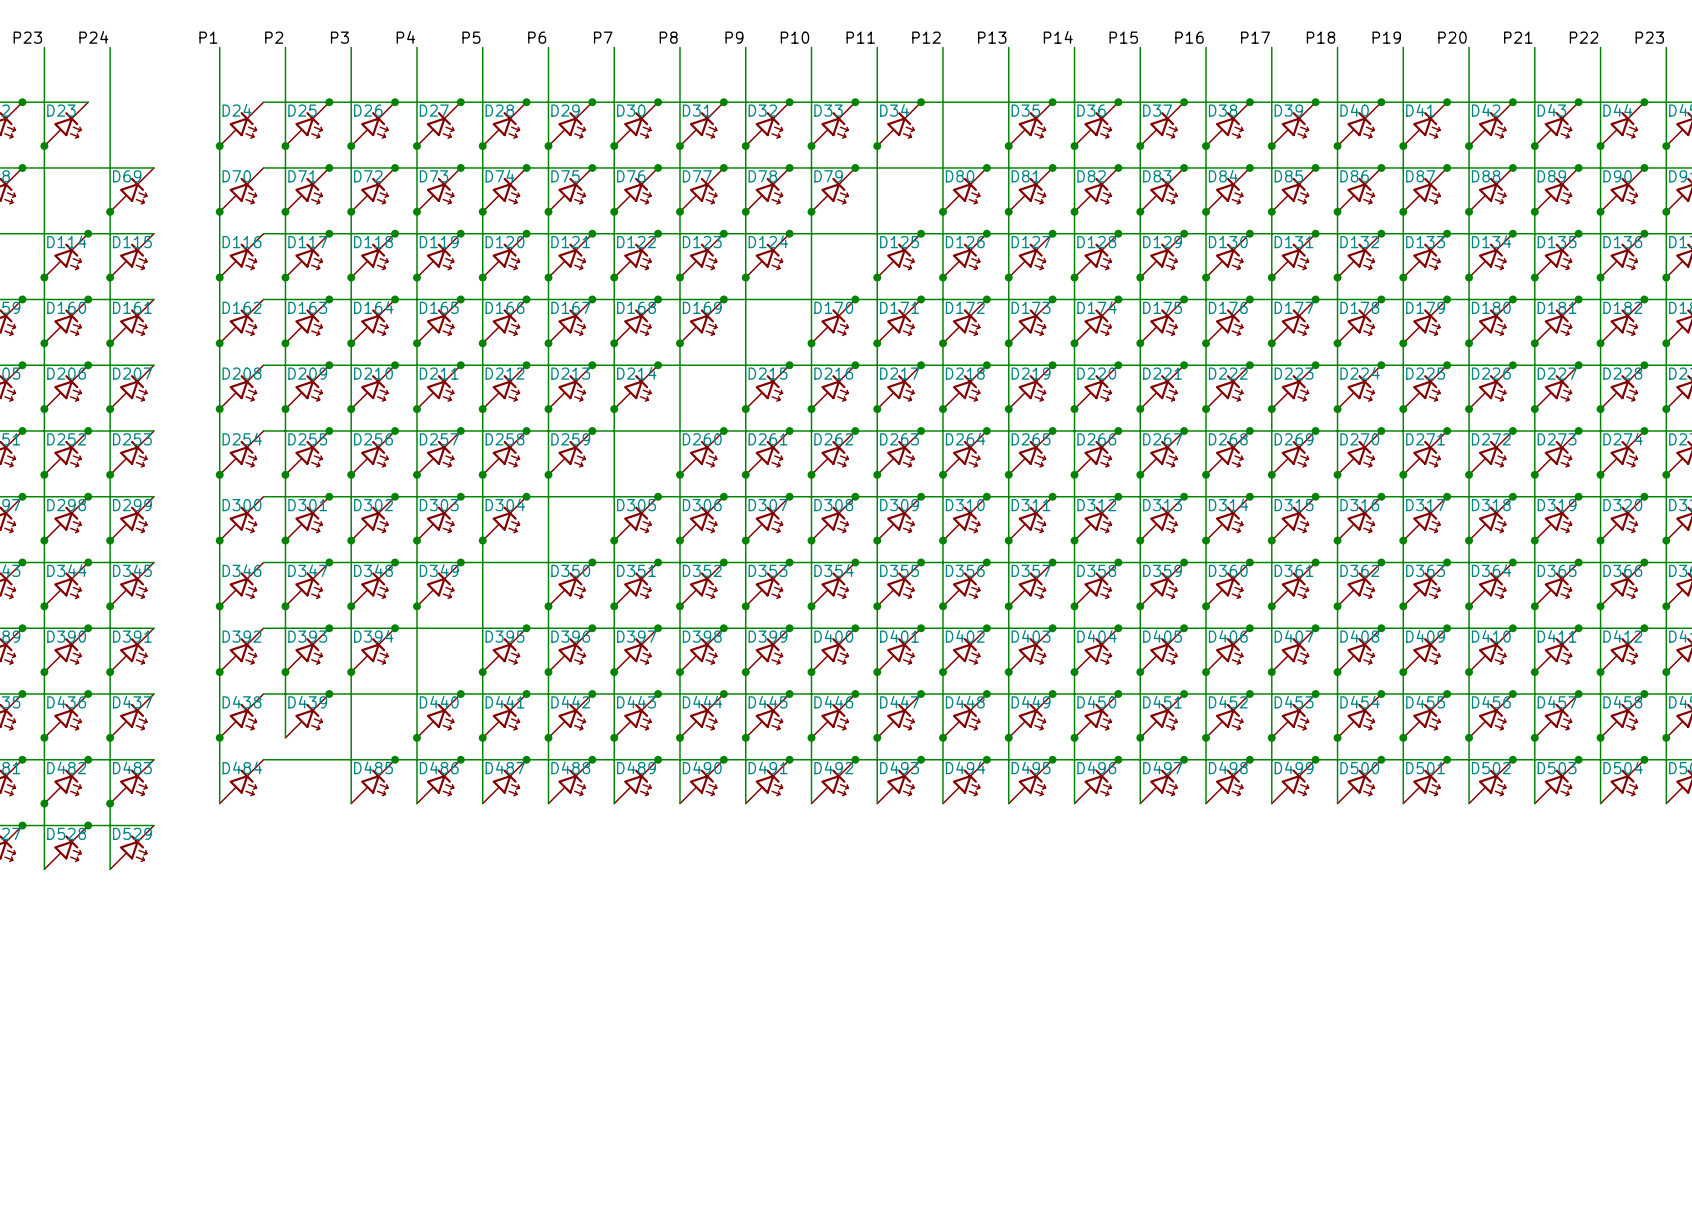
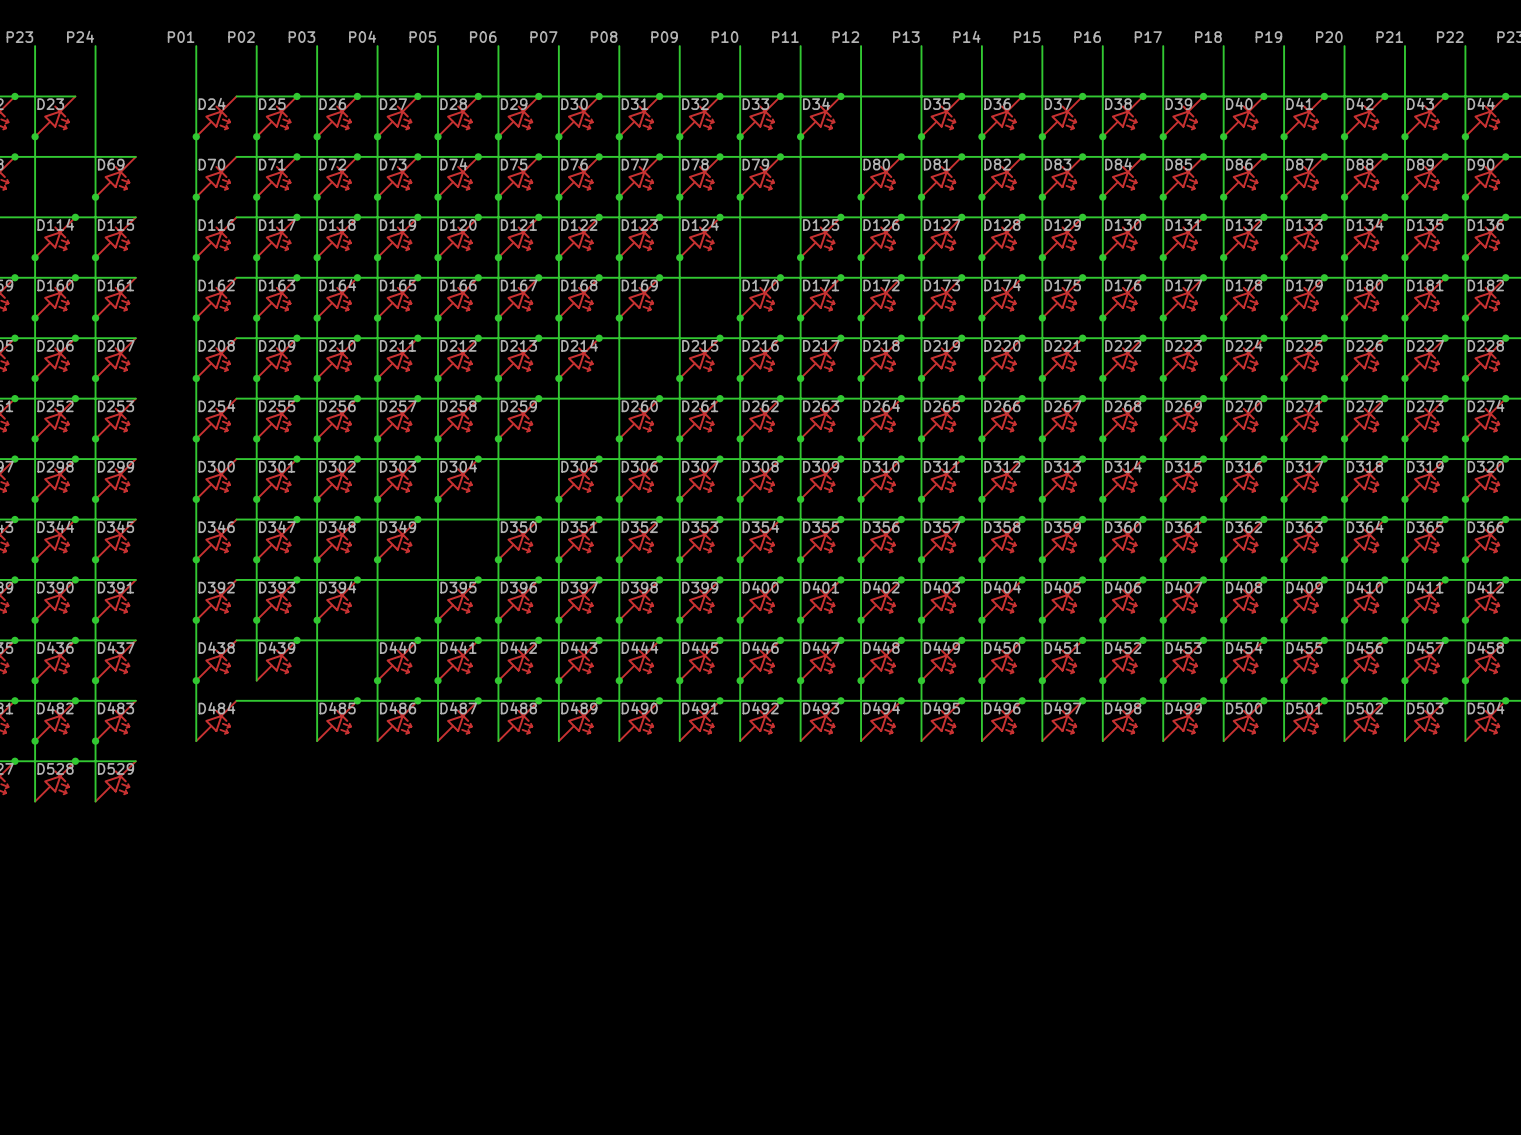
label: P1 (208, 37) -> P01 (181, 37)
label: P2 (274, 37) -> P02 (241, 37)
label: P3 (339, 37) -> P03 (301, 37)
label: P4 (405, 37) -> P04 (362, 36)
label: P5 (471, 37) -> P05 (422, 37)
label: P6 (537, 37) -> P06 (483, 37)
label: P7 (603, 37) -> P07 (543, 37)
label: P8 (668, 37) -> P08 (604, 37)
label: P9 (734, 37) -> P09 (664, 37)

